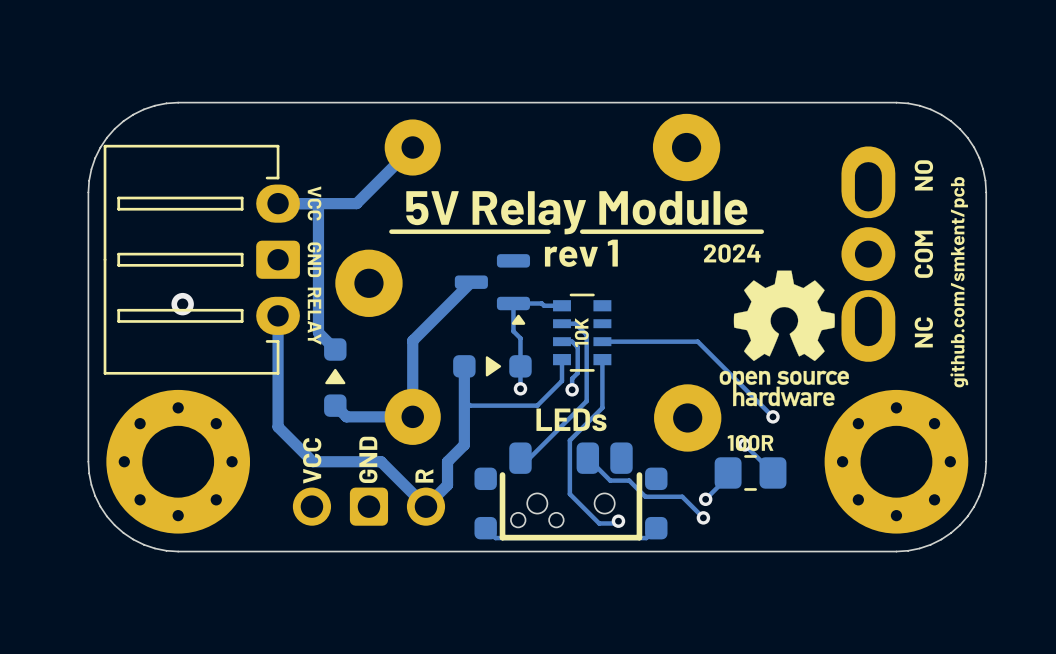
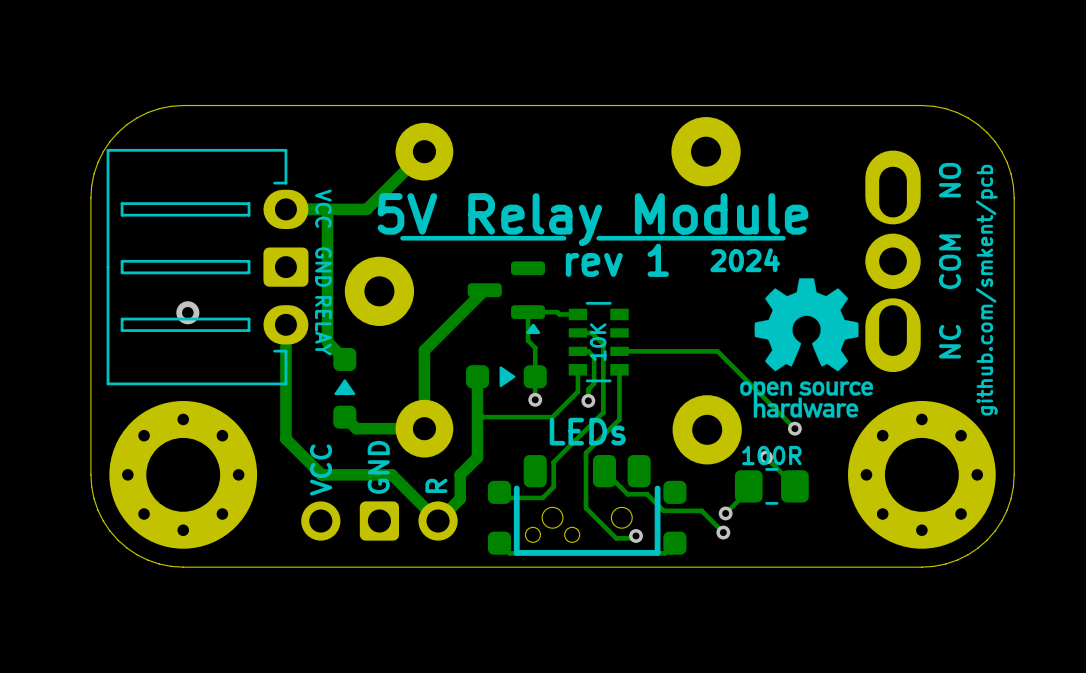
track: (538, 449) (529, 458) (520, 458) -> (553, 462) (553, 486) (542, 497) (505, 497) (499, 492)

